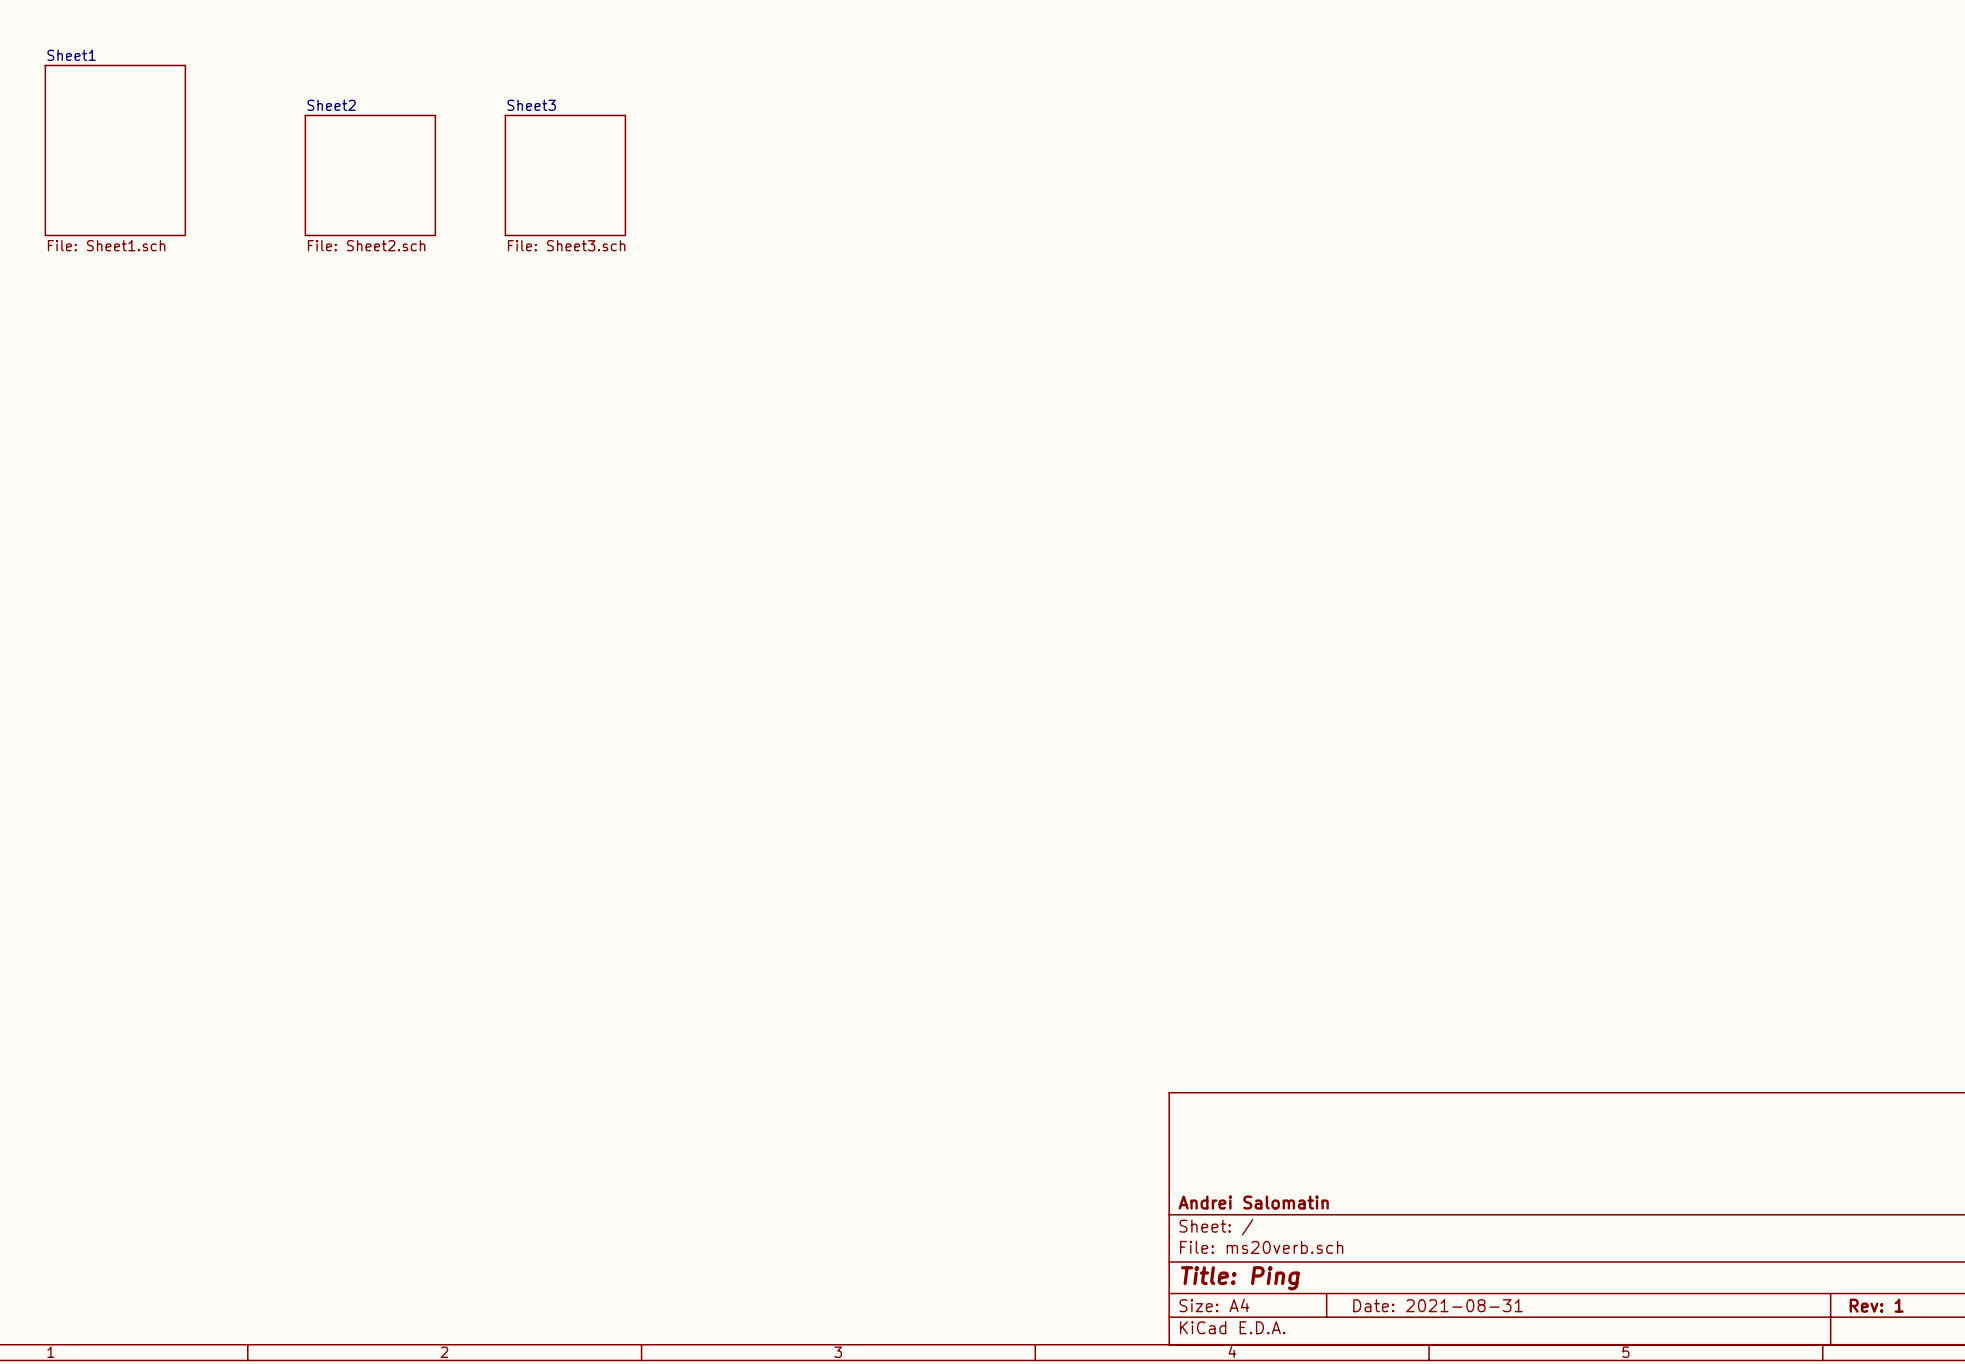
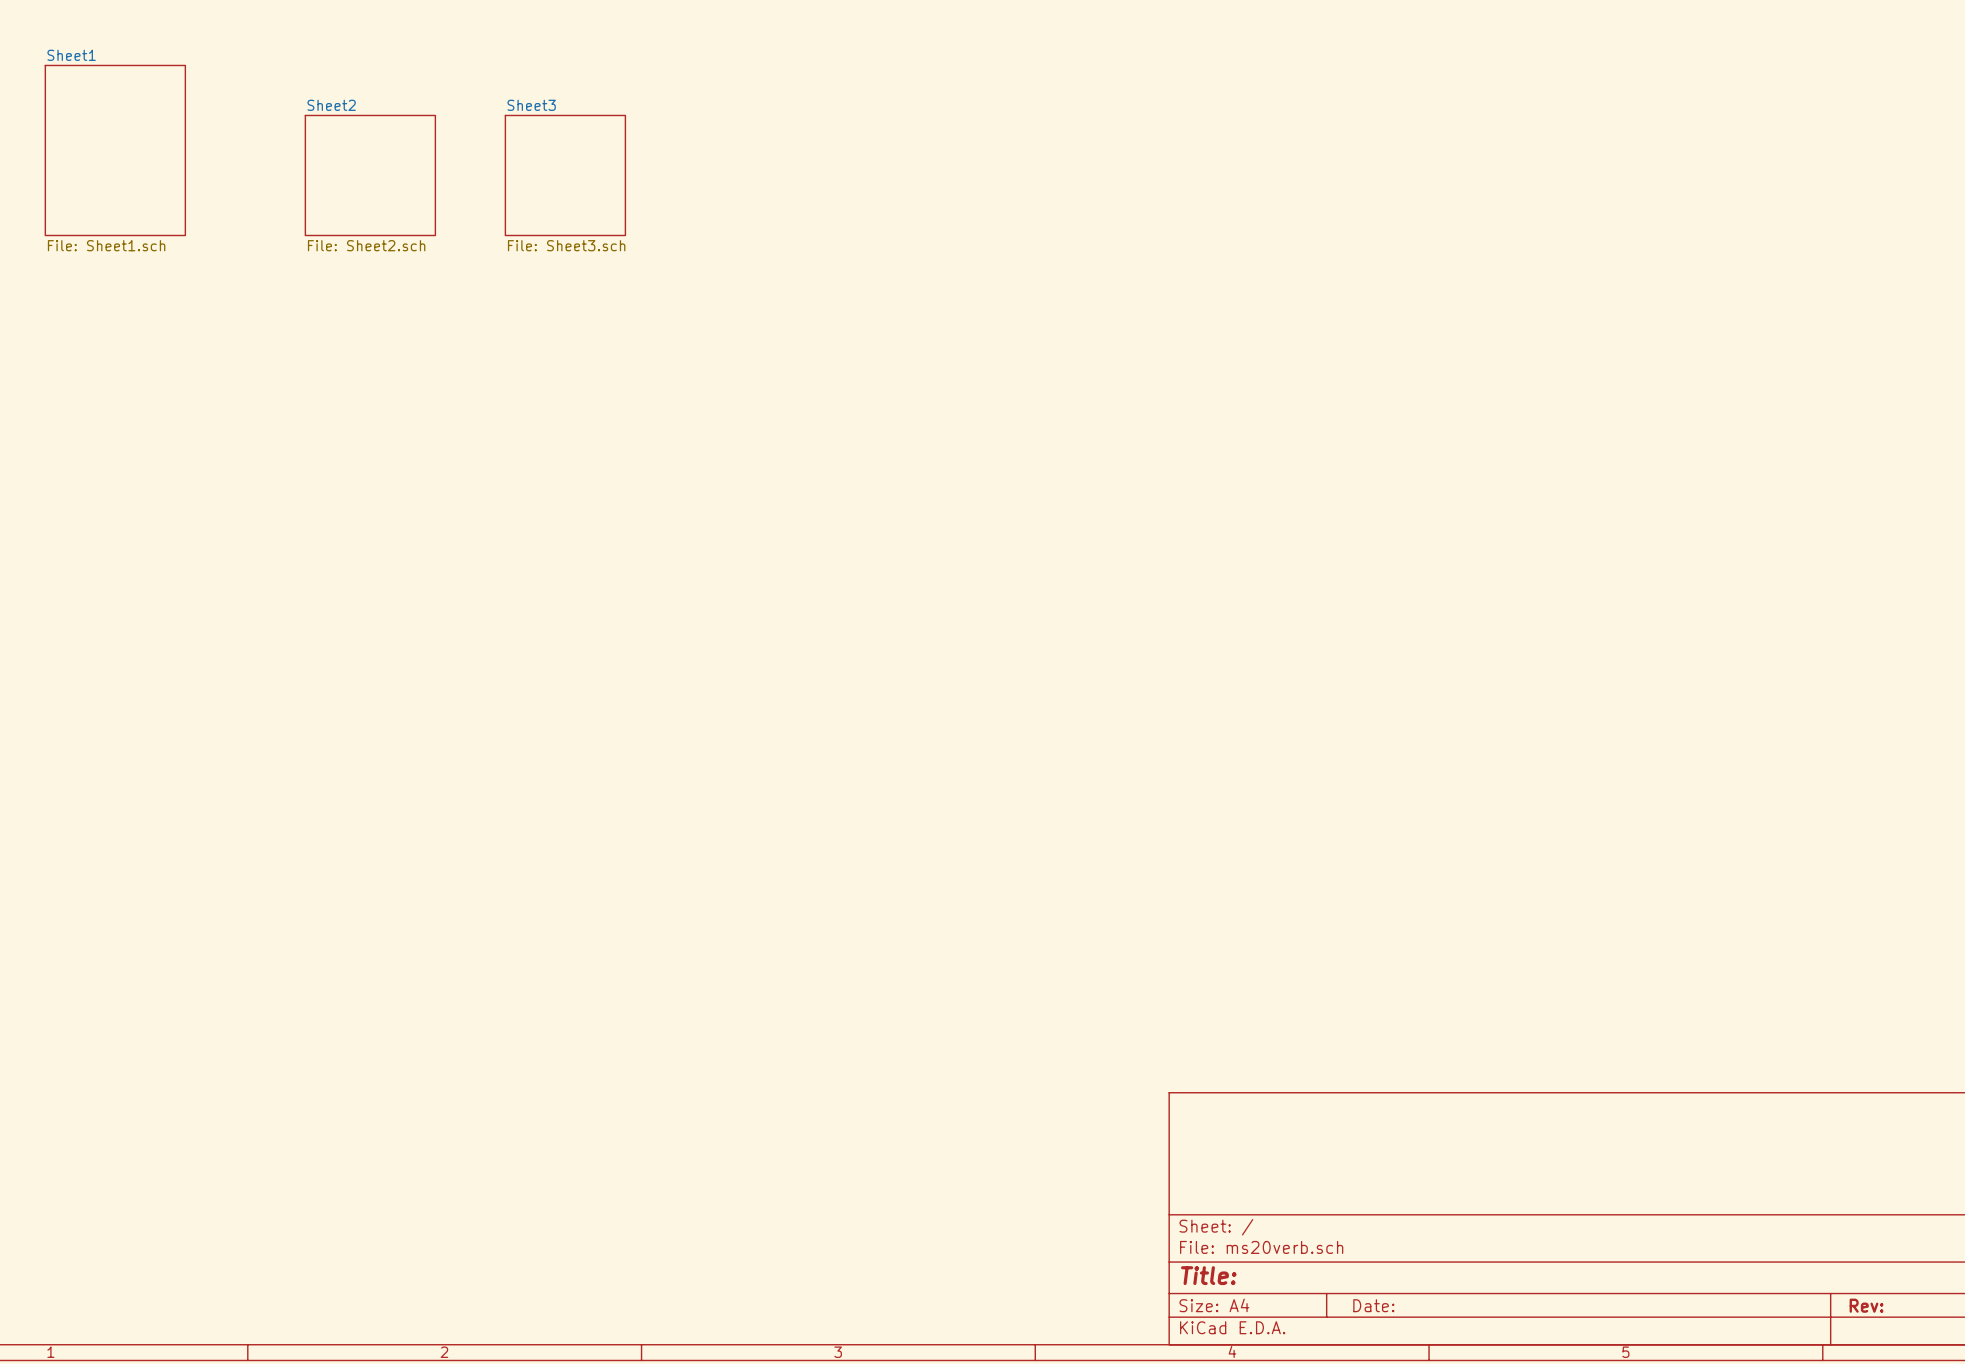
title block: Andrei Salomatin (1253, 1202) -> none
title block: Title: Ping (1240, 1278) -> Title: (1208, 1275)
title block: Date: 2021-08-31 (1437, 1305) -> Date: (1373, 1305)
title block: Rev: 1 (1876, 1305) -> Rev: (1866, 1305)

